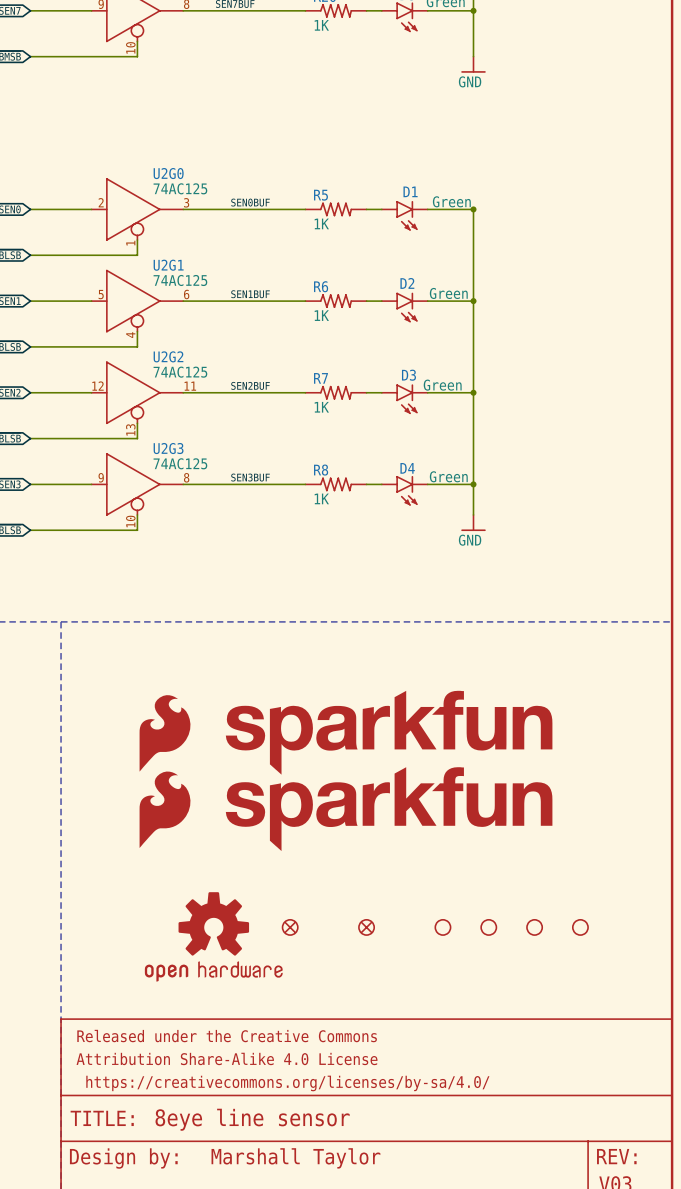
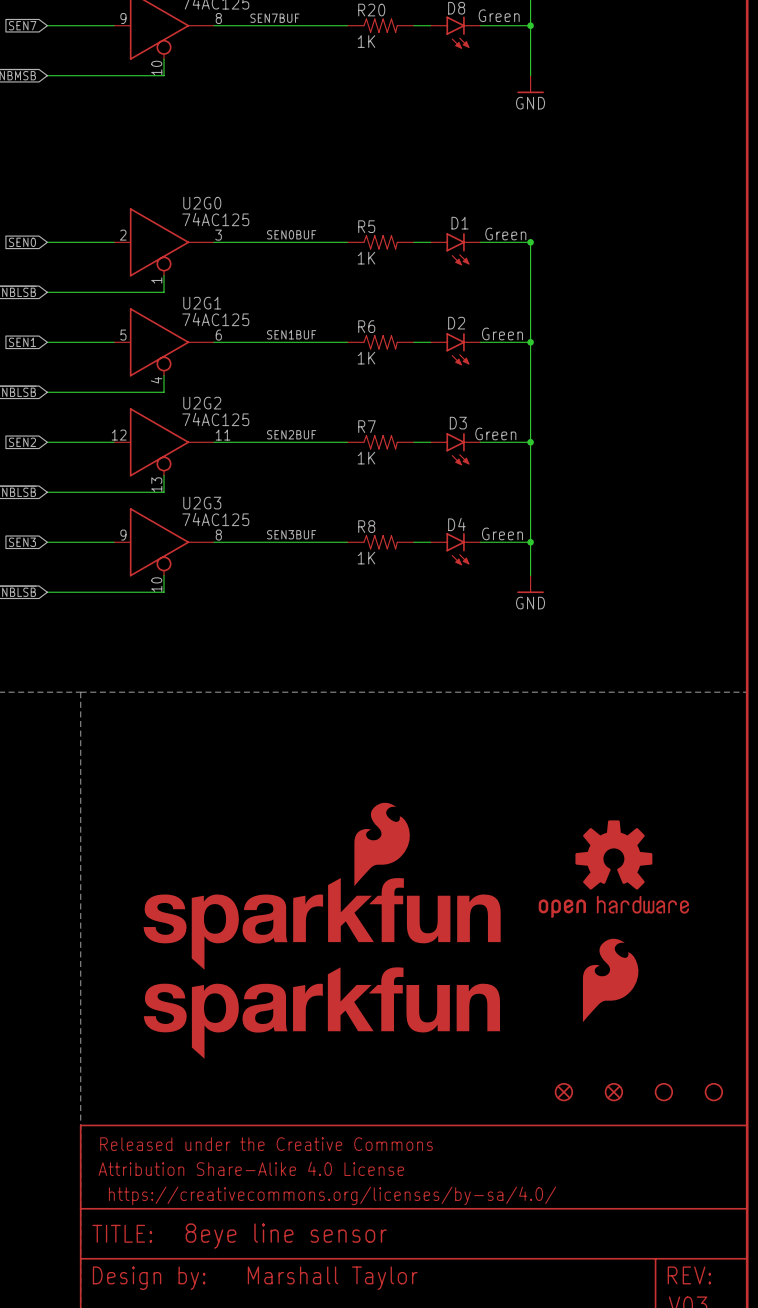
part: (389, 732) -> none
part: (165, 733) -> none
part: none -> (613, 869)
part: none -> (322, 886)
part: (165, 809) -> none
part: (389, 809) -> none
part: none -> (610, 980)
part: none -> (321, 1013)
part: (290, 927) -> none
part: (366, 927) -> none
part: (442, 927) -> none
part: (488, 927) -> none
part: (534, 927) -> none
part: (580, 927) -> none
part: (213, 936) -> none
part: none -> (563, 1092)
part: none -> (613, 1092)
part: none -> (663, 1092)
part: none -> (713, 1092)

